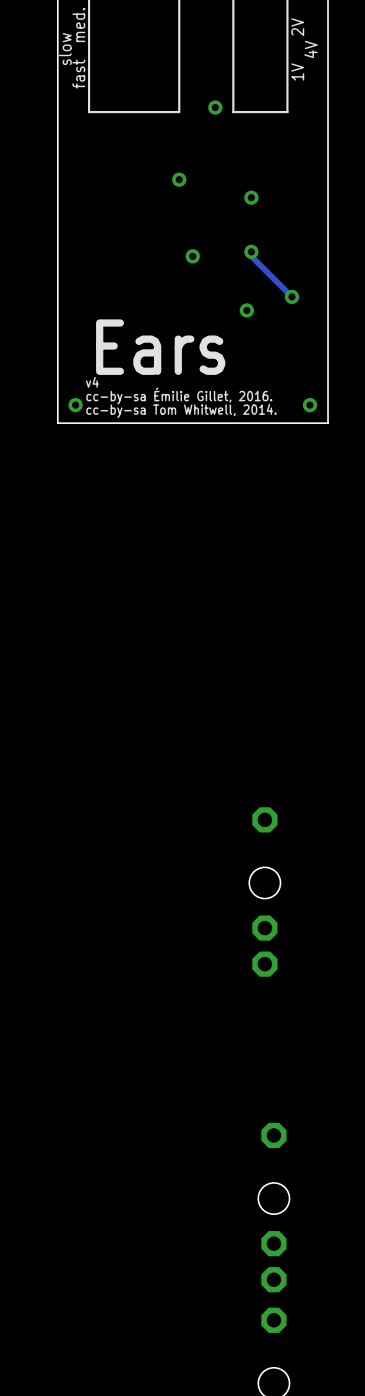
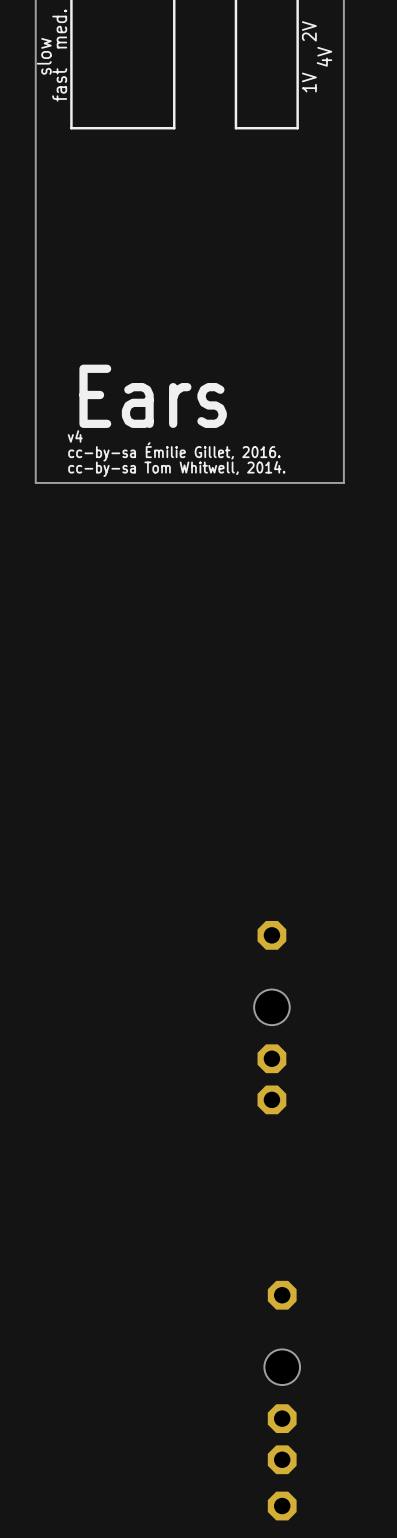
via: (215, 107) -> none
via: (179, 179) -> none
via: (251, 197) -> none
track: (251, 251) (251, 256) (291, 296) -> none
via: (251, 251) -> none
via: (192, 256) -> none
via: (291, 296) -> none
via: (246, 310) -> none
via: (75, 405) -> none
via: (309, 405) -> none

